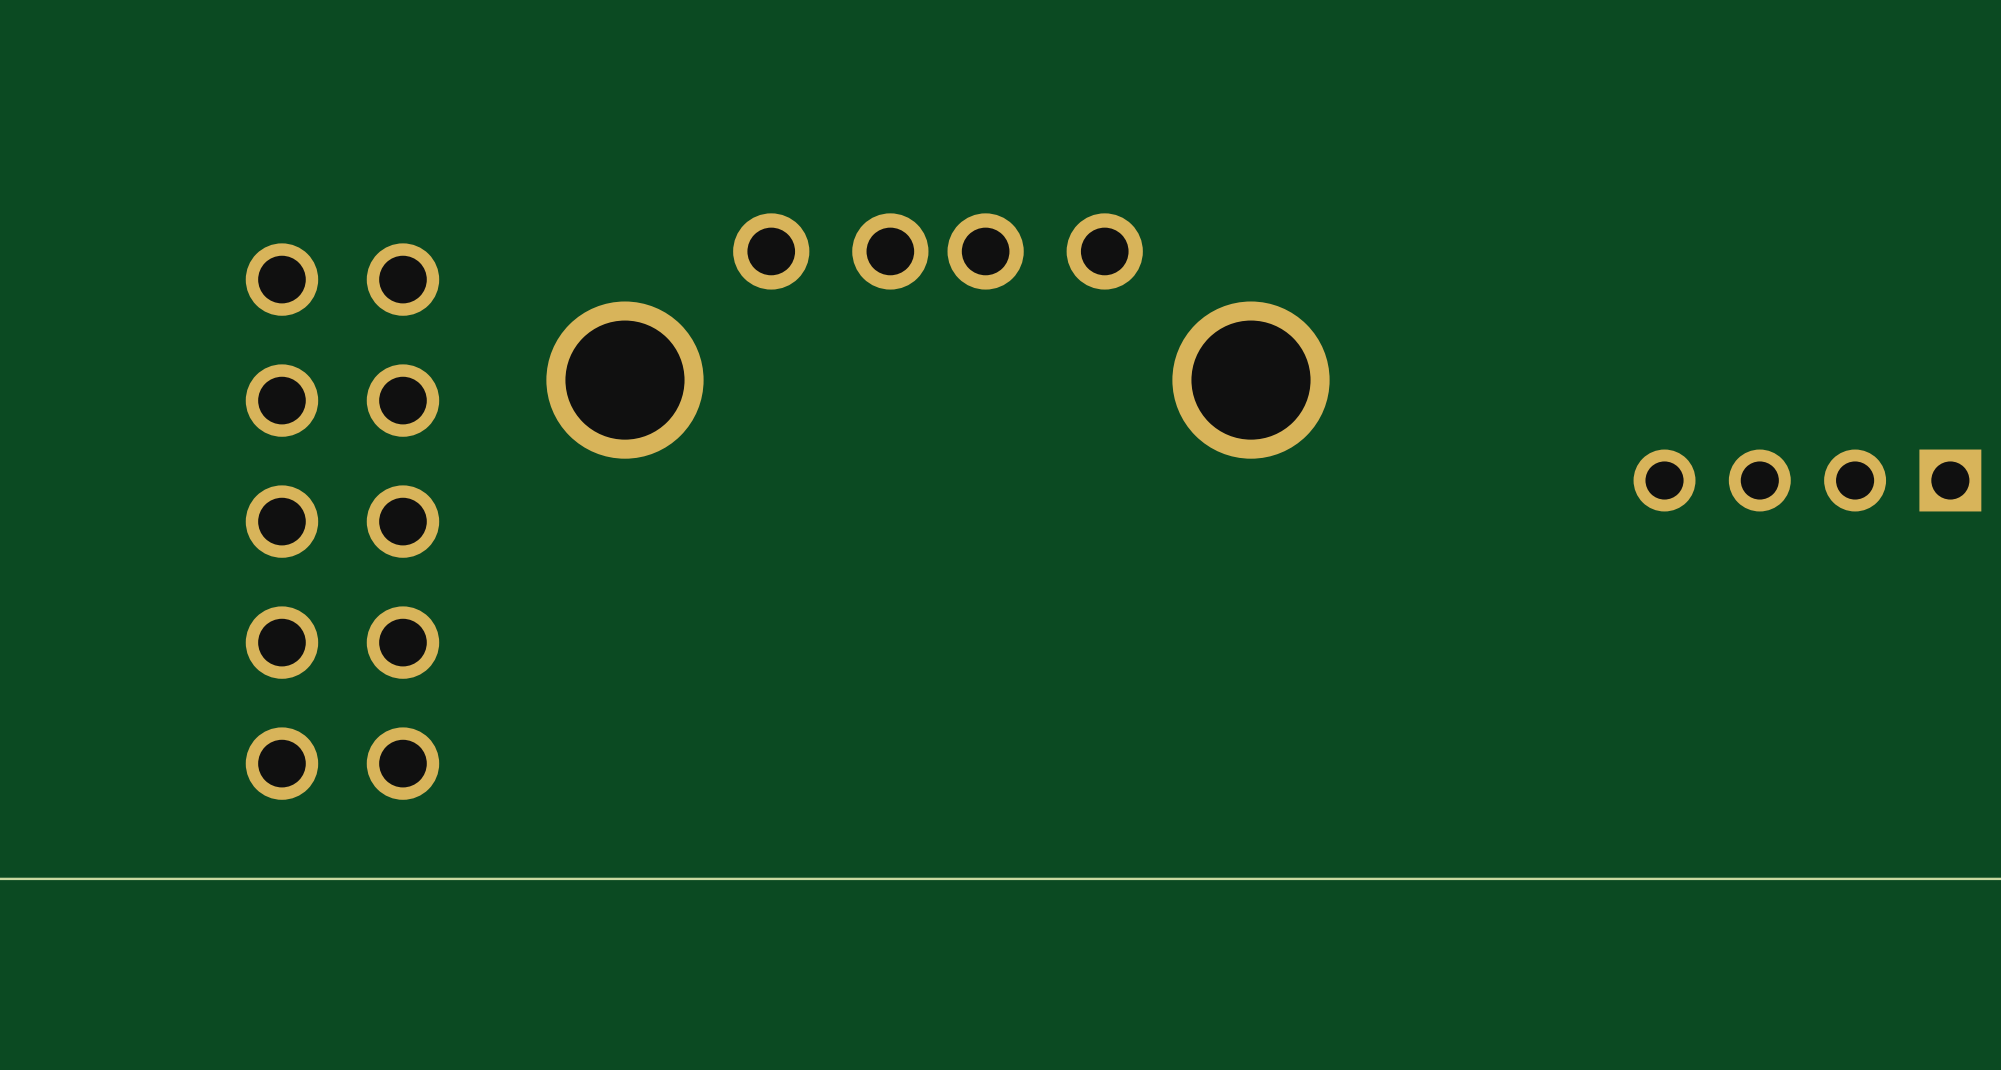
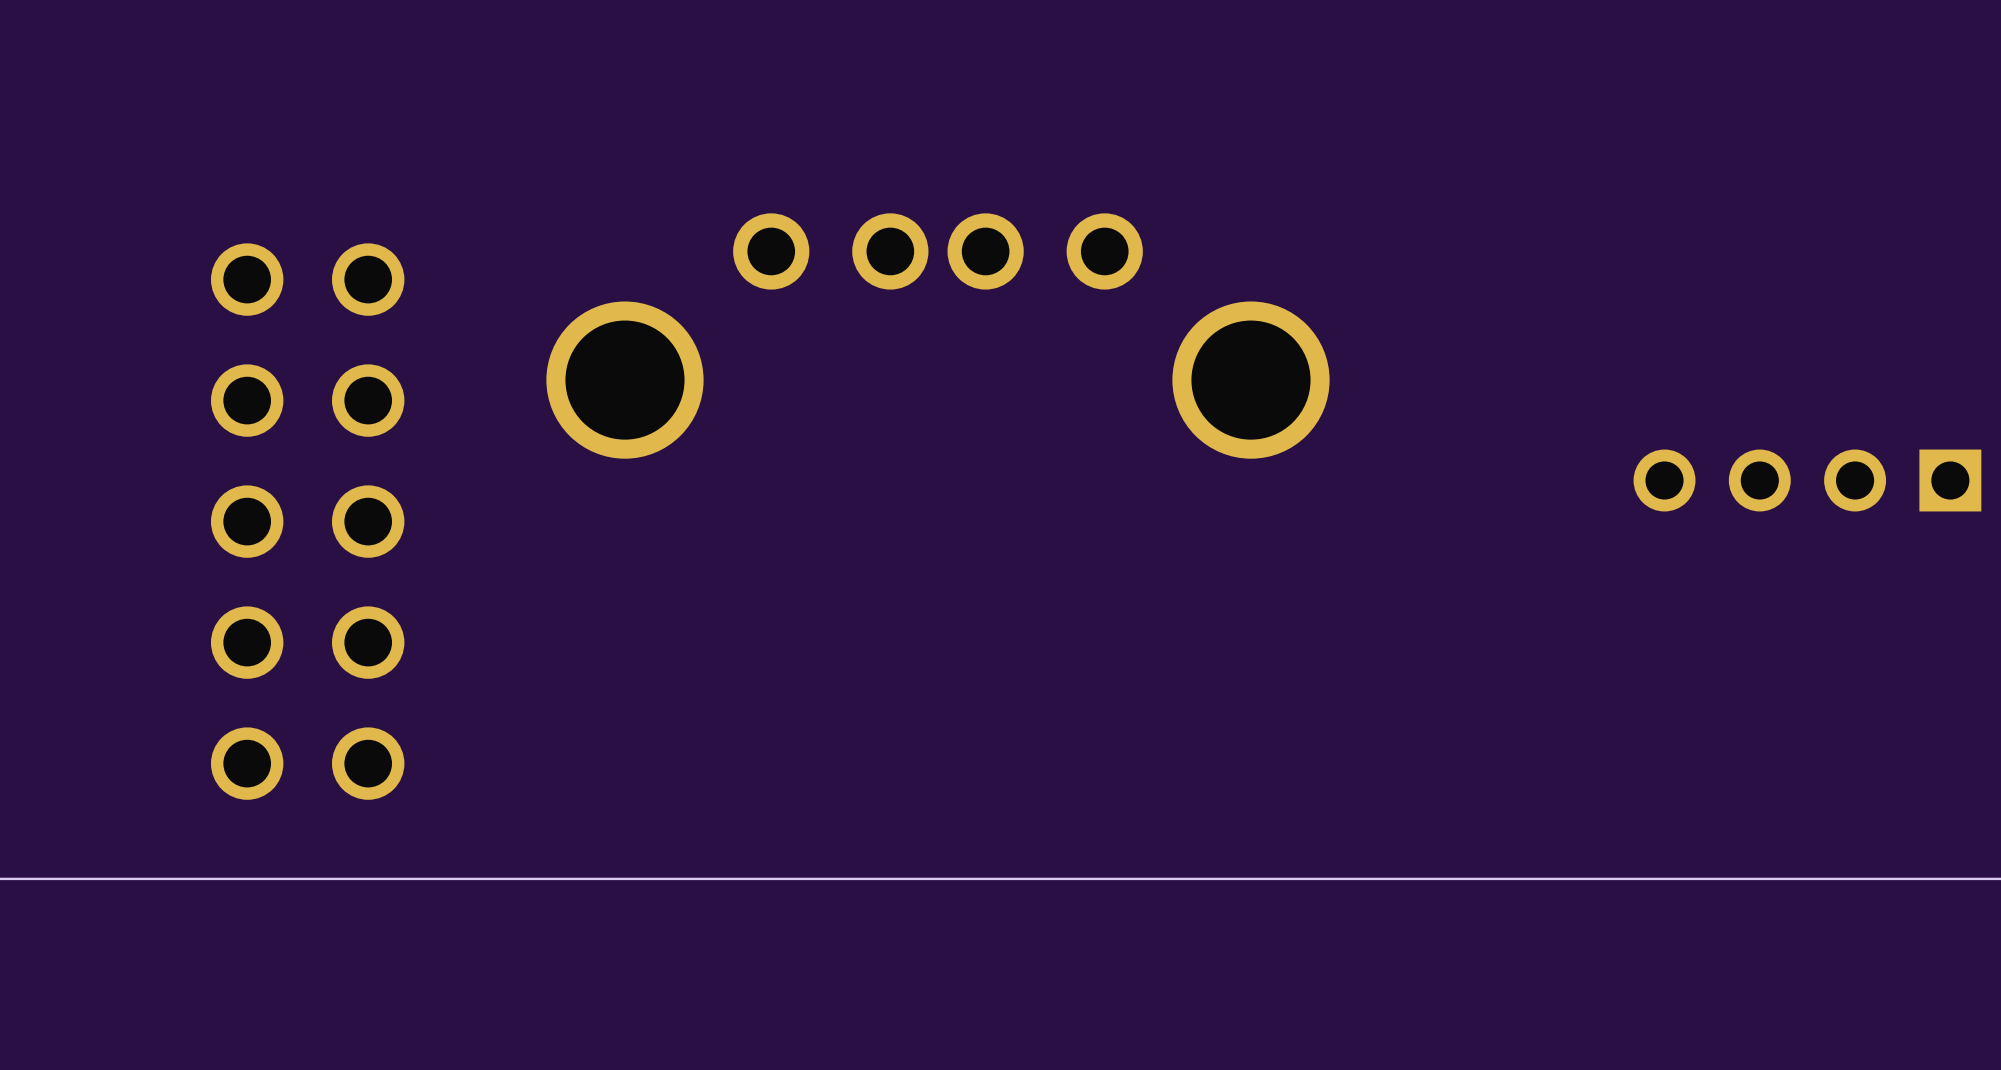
part position: (342, 521) -> (307, 521)

